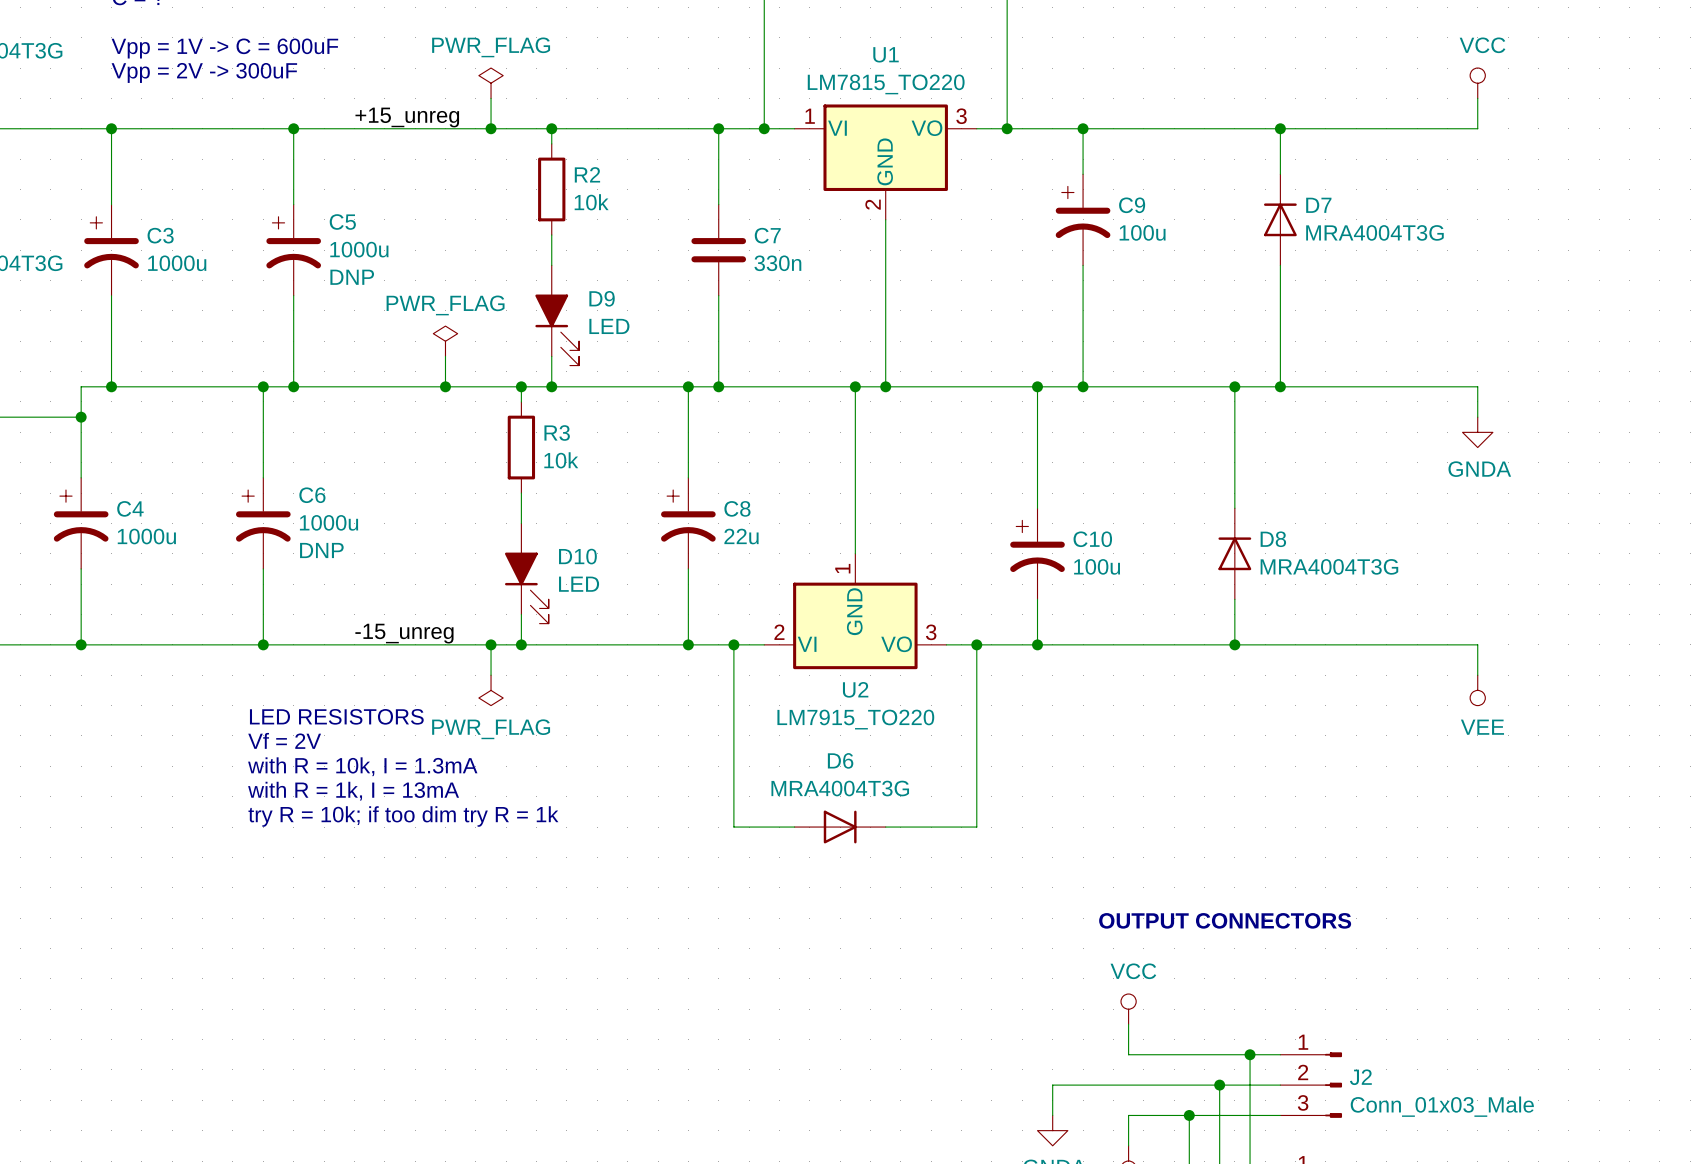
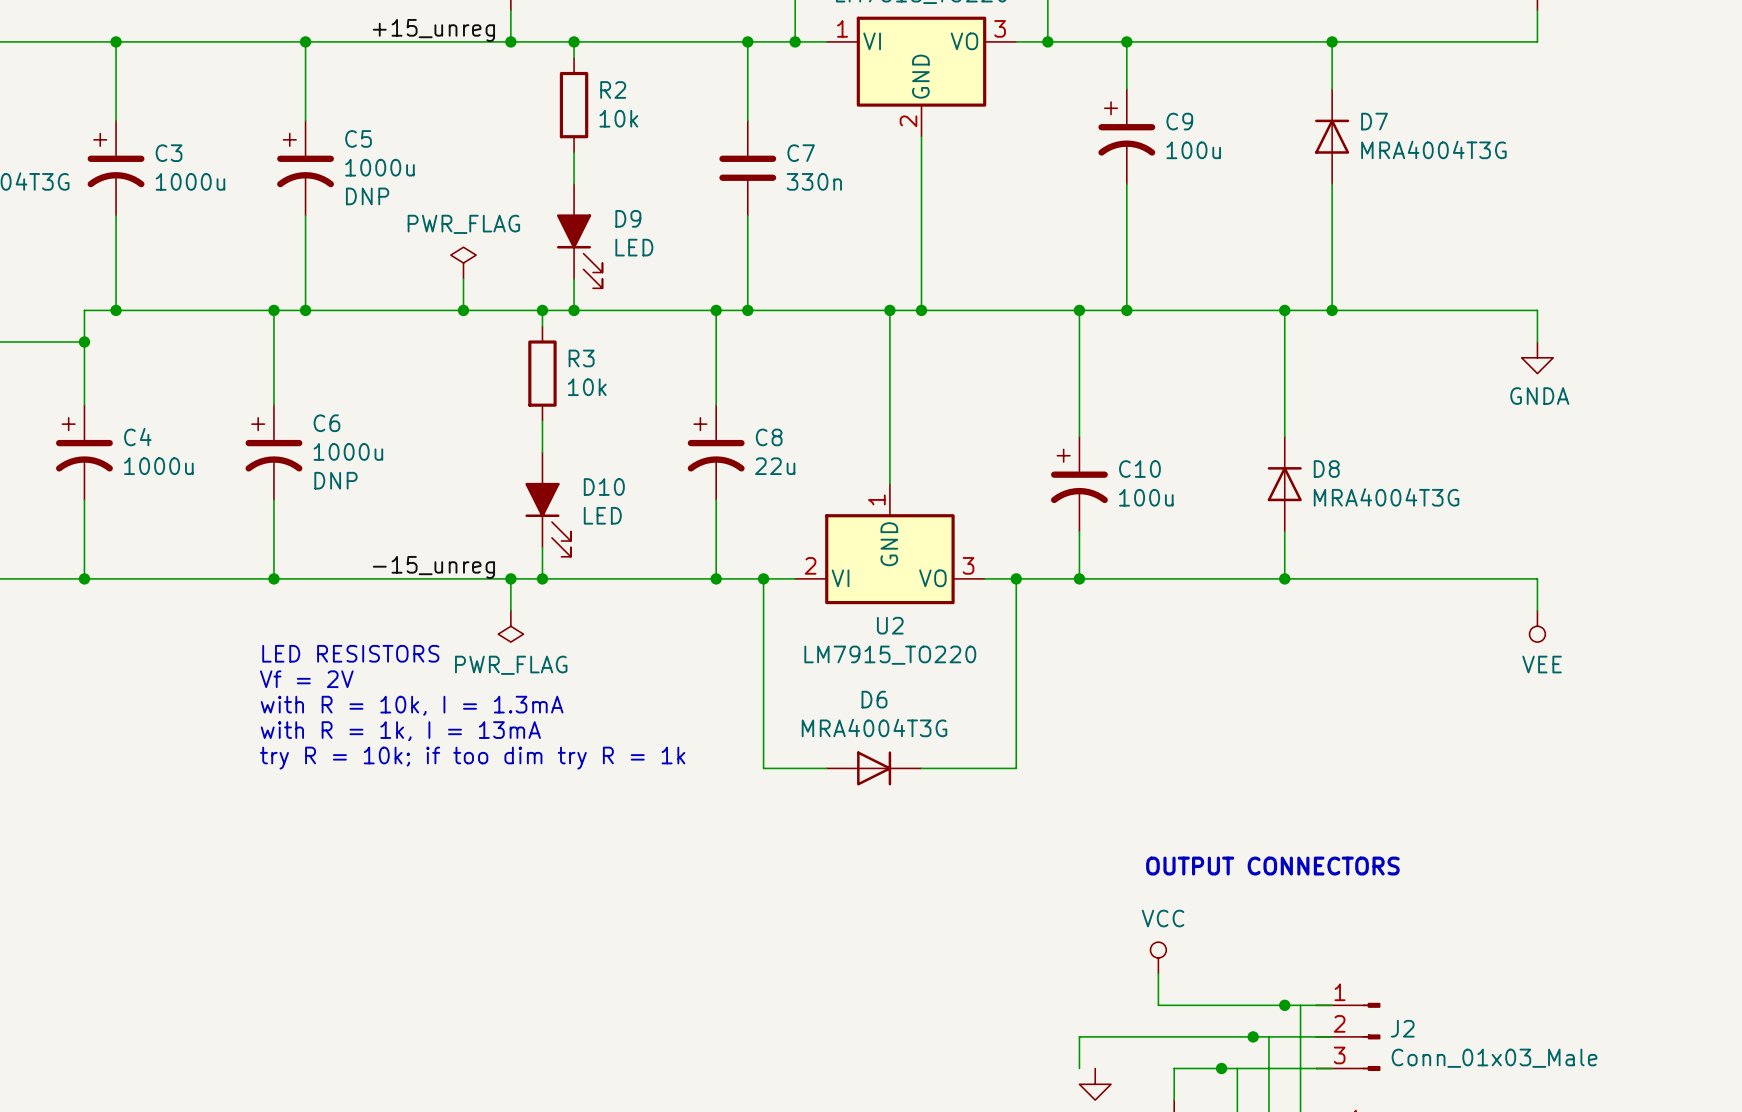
power symbol position: VCC (1128, 1009) -> VCC (1158, 957)
wire: (1128, 1024) (1128, 1054) -> (1158, 973) (1158, 1005) (1174, 1005)
junction position: (1250, 1054) -> (1284, 1005)
wire: (1052, 1085) (1052, 1115) -> (1095, 1036) (1079, 1036) (1079, 1068)
junction position: (1219, 1085) -> (1253, 1036)
J2 position: (1311, 1085) -> (1348, 1036)
junction position: (1189, 1115) -> (1221, 1068)

